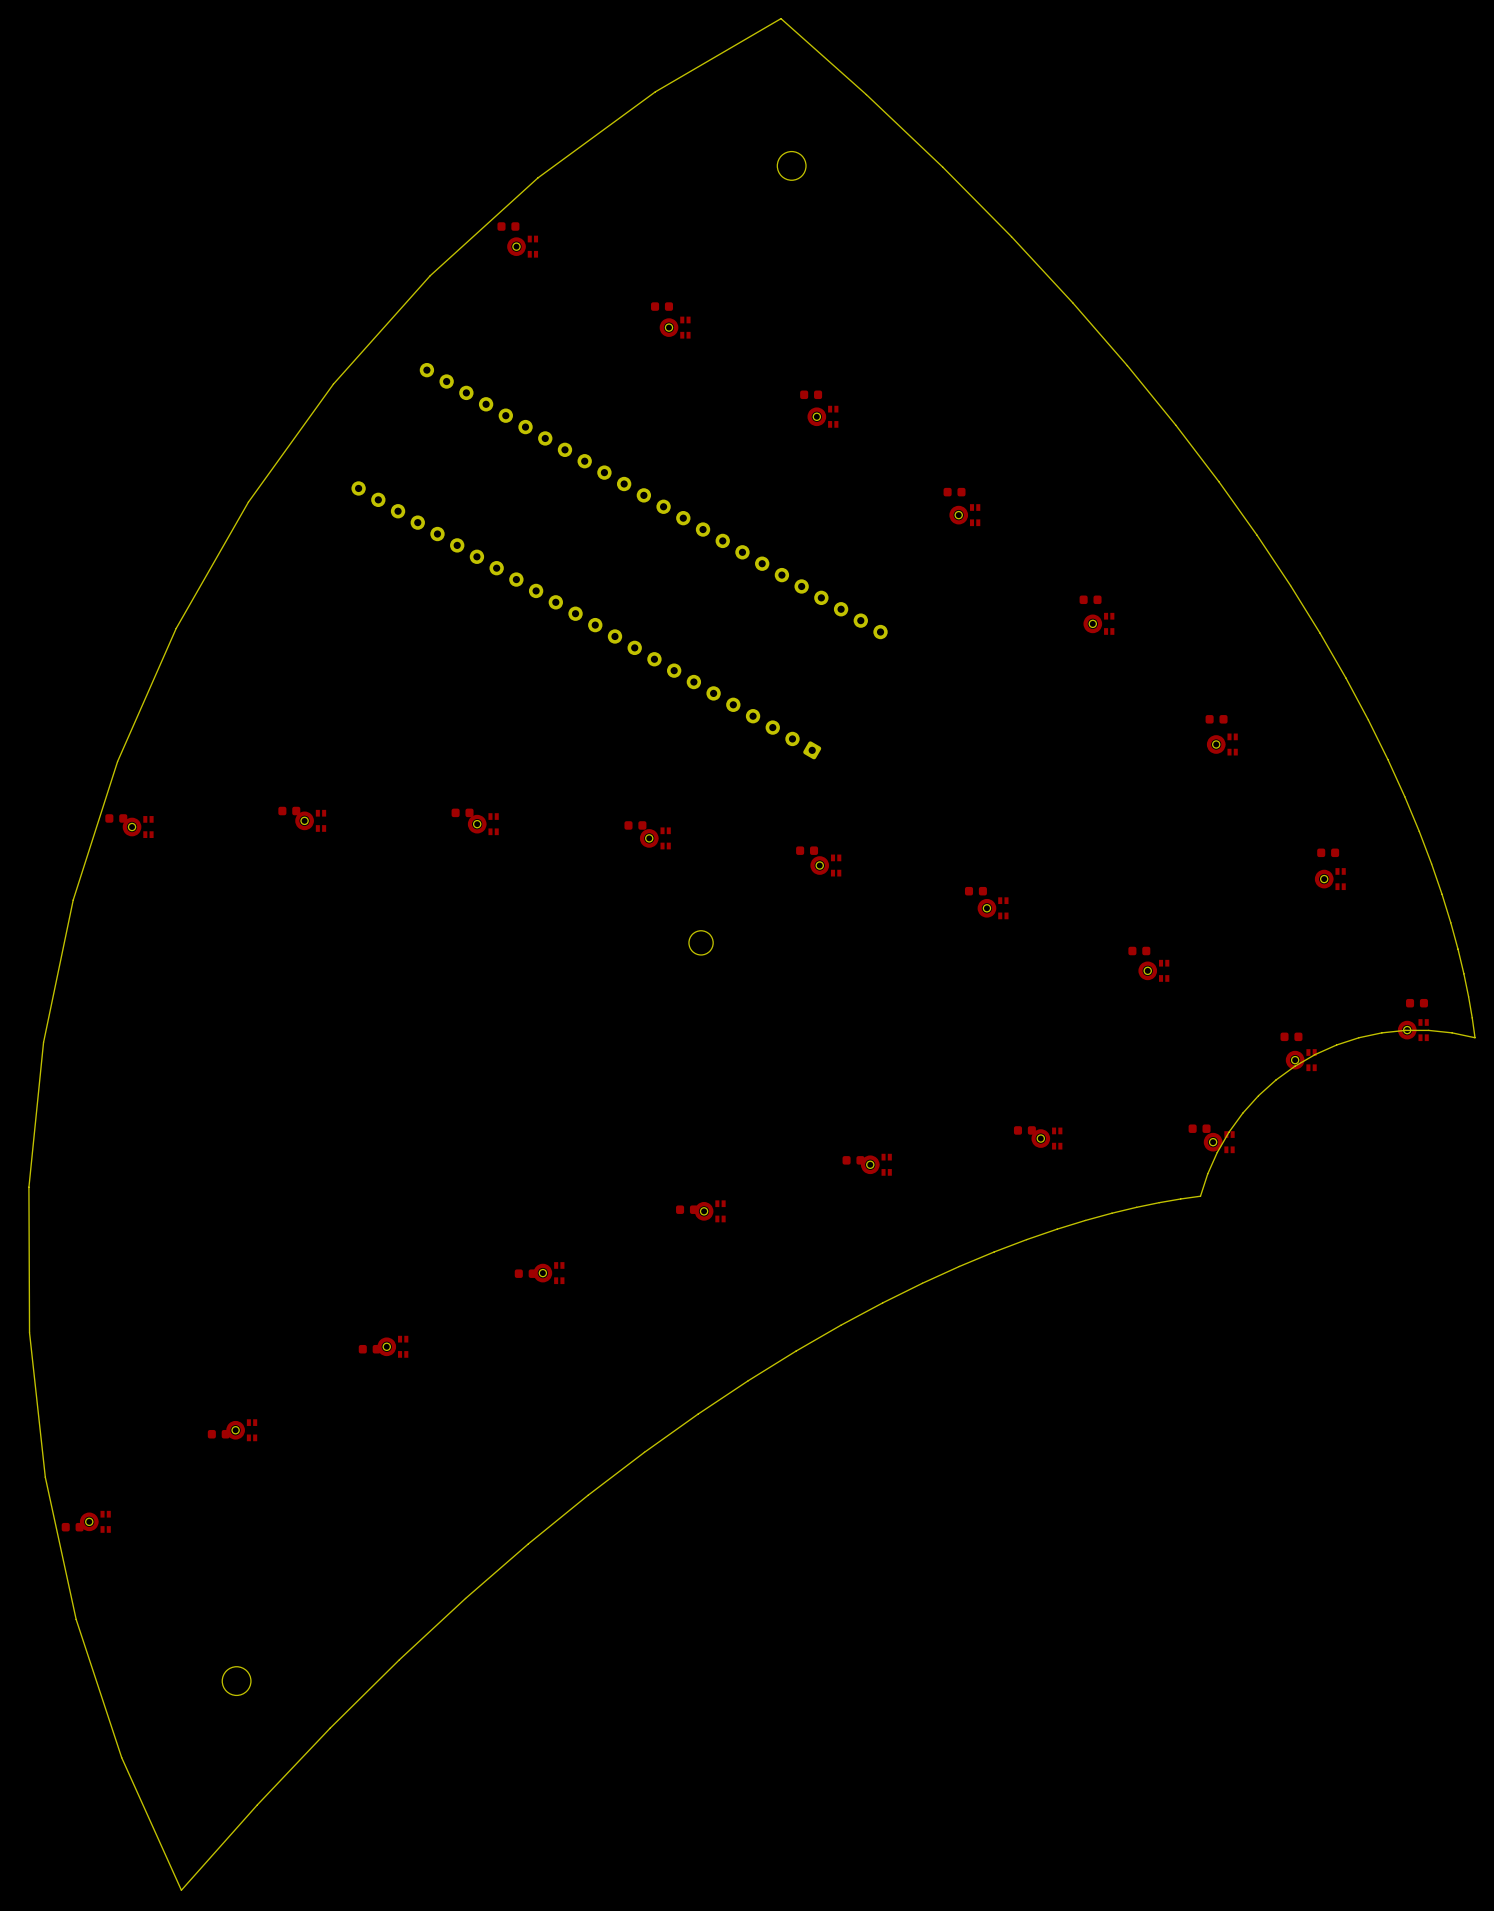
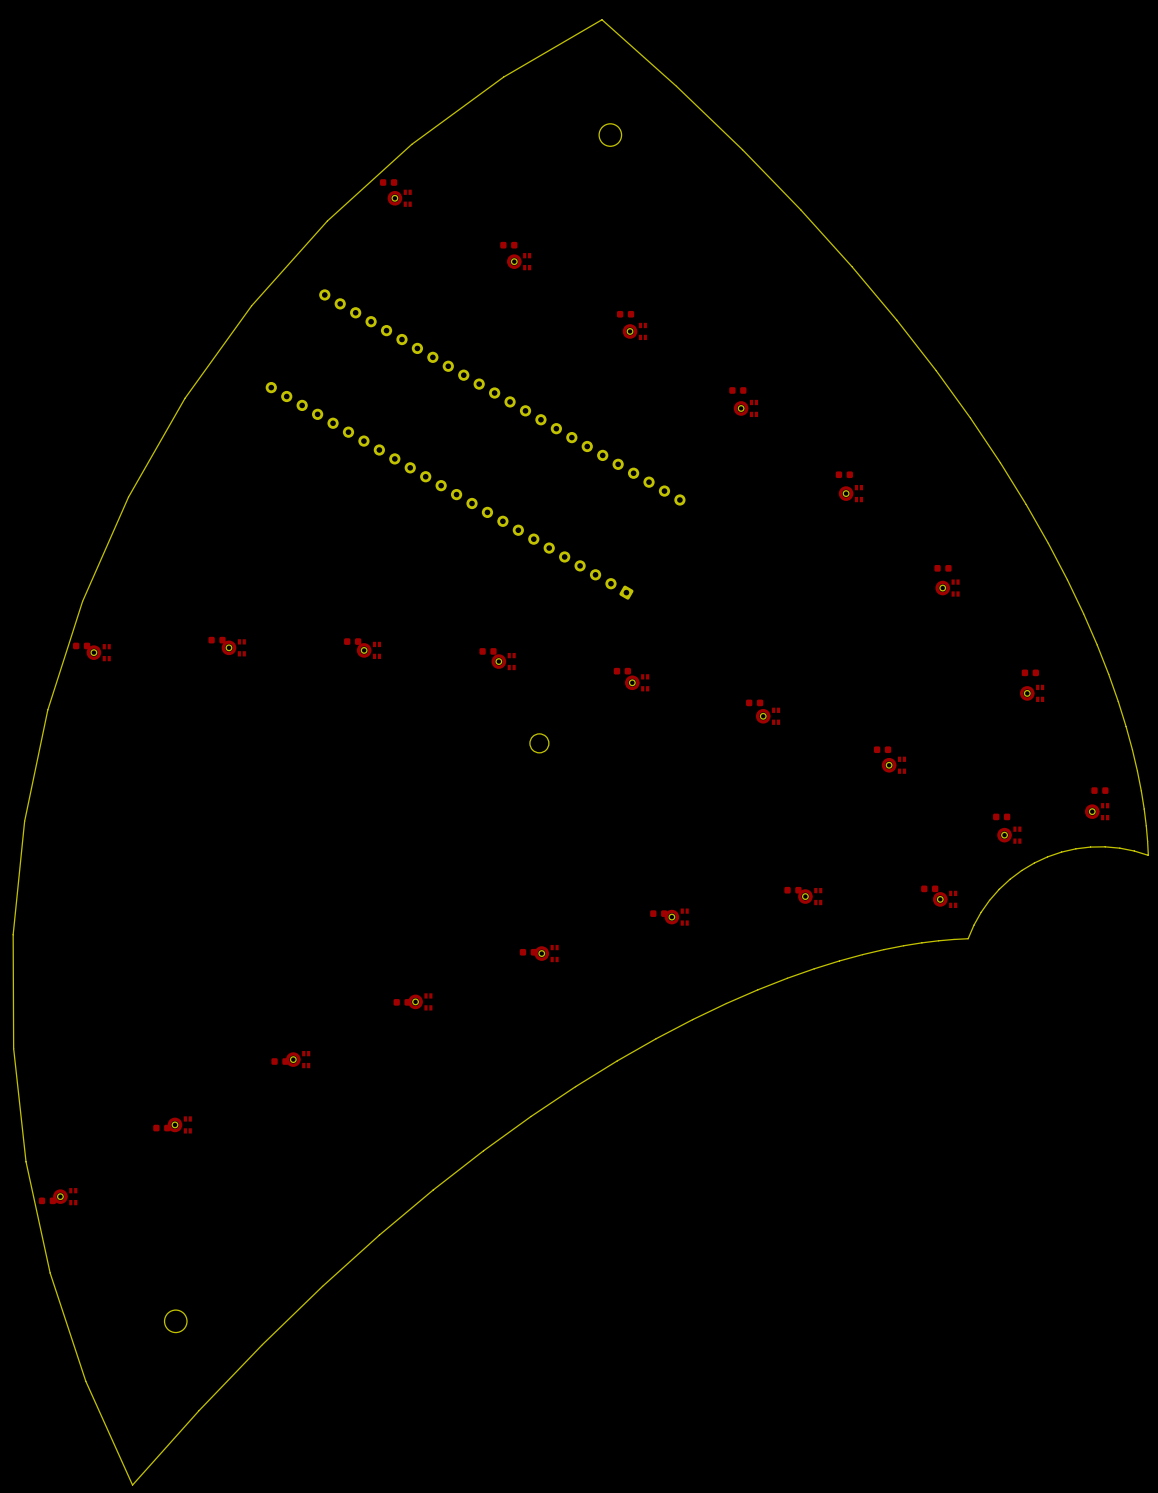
board edge: (780, 18) (866, 94) (942, 167) (1011, 236) (1072, 302) (1175, 425) (1256, 535) (1290, 585) (1345, 677) (1404, 796) (1431, 863) (1450, 922) (1463, 973) (1475, 1037) (1452, 1032) (1405, 1030) (1358, 1037) (1315, 1054) (1275, 1080) (1242, 1113) (1217, 1152) (1200, 1196) (1111, 1213) (1057, 1229) (994, 1251) (882, 1302) (795, 1351) (748, 1380) (644, 1452) (587, 1495) (465, 1598) (399, 1659) (330, 1728) (257, 1804) (181, 1890) -> (601, 19) (676, 86) (742, 149) (851, 266) (936, 370) (1000, 462) (1026, 504) (1067, 579) (1108, 674) (1126, 726) (1137, 771) (1144, 809) (1148, 855) (1119, 848) (1105, 846) (1075, 848) (1047, 856) (1021, 870) (999, 889) (981, 912) (968, 938) (921, 942) (884, 949) (839, 960) (787, 978) (692, 1019) (617, 1060) (575, 1086) (483, 1150) (379, 1235) (262, 1344) (199, 1410) (132, 1485)

